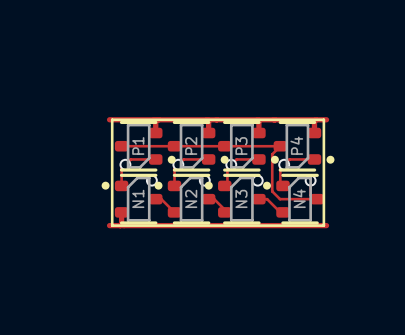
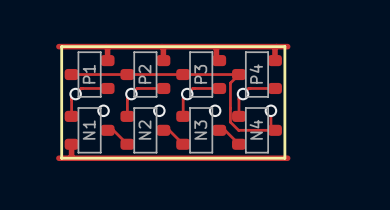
P1 footprint: [114, 120, 176, 172] -> [64, 51, 115, 98]
P2 footprint: [167, 120, 229, 172] -> [120, 51, 171, 98]
P3 footprint: [218, 120, 279, 172] -> [176, 51, 227, 98]
P4 footprint: [273, 120, 335, 172] -> [232, 51, 282, 98]
N1 footprint: [101, 173, 163, 225] -> [64, 107, 115, 154]
N2 footprint: [154, 173, 216, 225] -> [120, 107, 171, 154]
N3 footprint: [204, 173, 266, 225] -> [176, 107, 227, 154]
N4 footprint: [263, 173, 324, 225] -> [232, 107, 282, 154]

